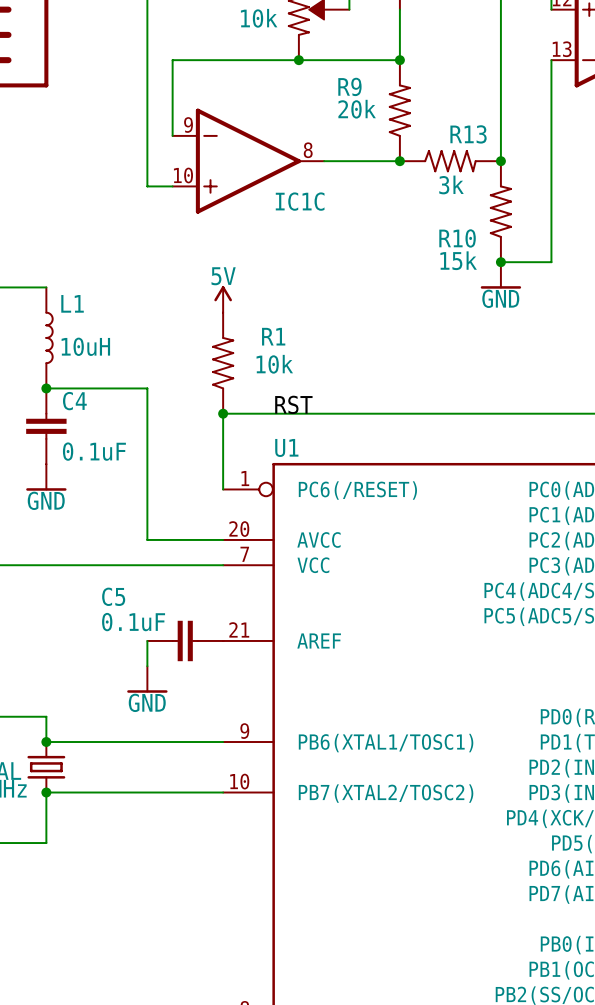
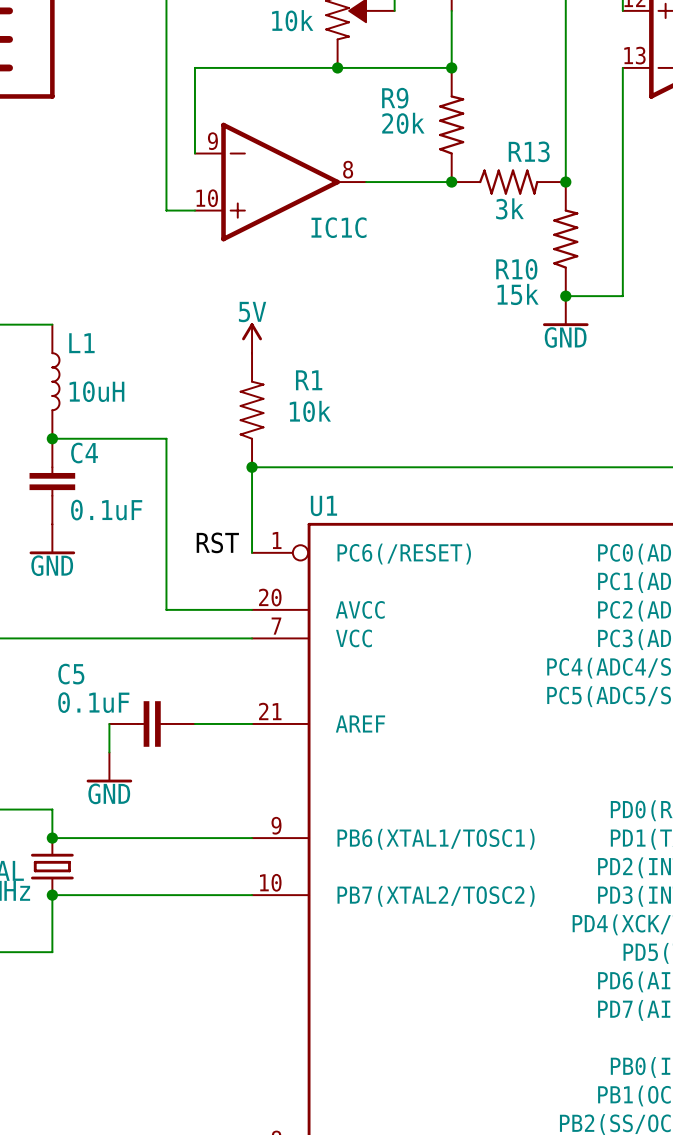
label position: RST (293, 404) -> RST (217, 542)
wire: (147, 640) (147, 666) -> (109, 723) (109, 752)
C5 position: (185, 640) -> (152, 723)
power symbol position: GND (147, 679) -> GND (109, 767)

